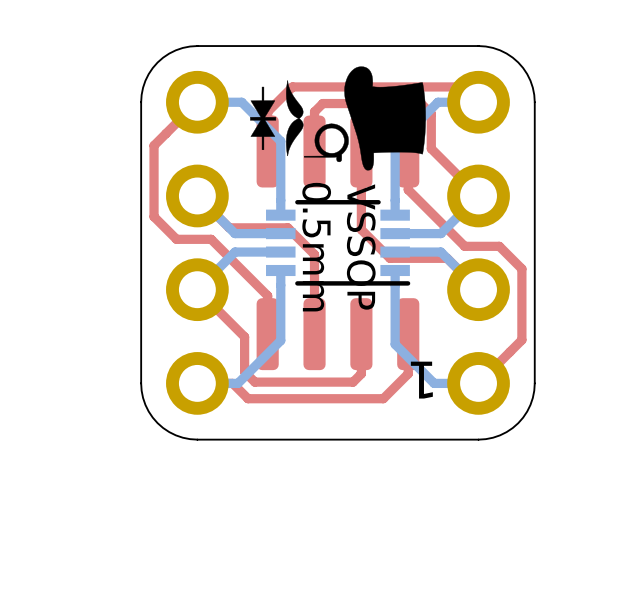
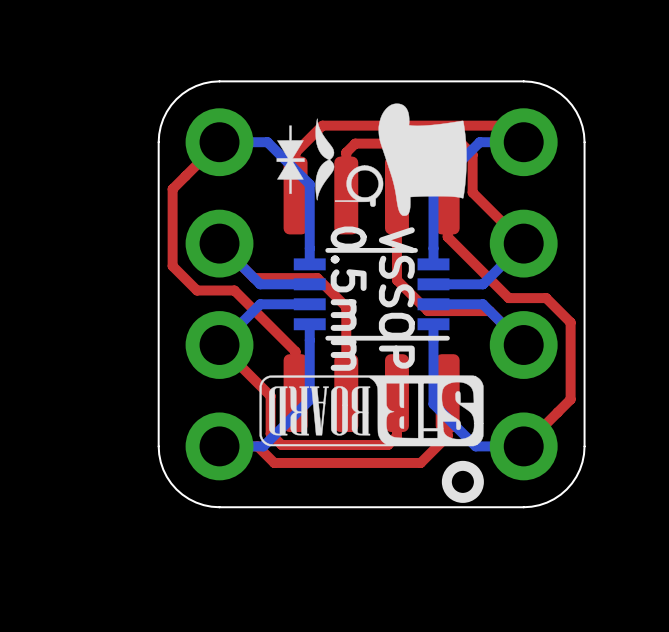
drawing: none -> [259, 375, 484, 503]
text: 1 (421, 380) -> none

